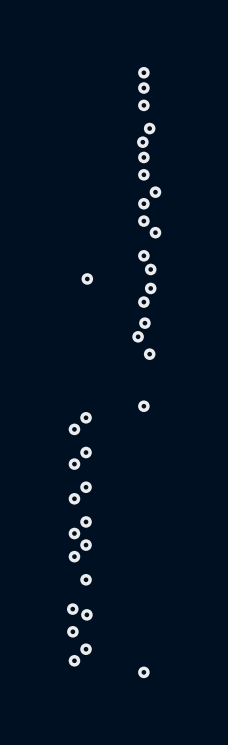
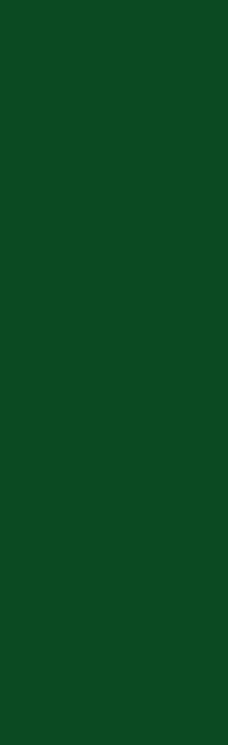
via: (143, 72) -> none
via: (143, 88) -> none
via: (143, 105) -> none
via: (149, 128) -> none
via: (142, 142) -> none
via: (143, 157) -> none
via: (143, 174) -> none
via: (155, 192) -> none
via: (143, 203) -> none
via: (143, 221) -> none
via: (155, 232) -> none
via: (143, 255) -> none
via: (150, 269) -> none
via: (87, 278) -> none
via: (150, 288) -> none
via: (143, 302) -> none
via: (144, 323) -> none
via: (138, 336) -> none
via: (149, 354) -> none
via: (143, 406) -> none
via: (86, 417) -> none
via: (74, 429) -> none
via: (86, 452) -> none
via: (74, 464) -> none
via: (86, 487) -> none
via: (74, 498) -> none
via: (86, 521) -> none
via: (74, 533) -> none
via: (86, 545) -> none
via: (74, 556) -> none
via: (86, 579) -> none
via: (72, 609) -> none
via: (86, 614) -> none
via: (72, 631) -> none
via: (86, 649) -> none
via: (74, 660) -> none
via: (143, 672) -> none

